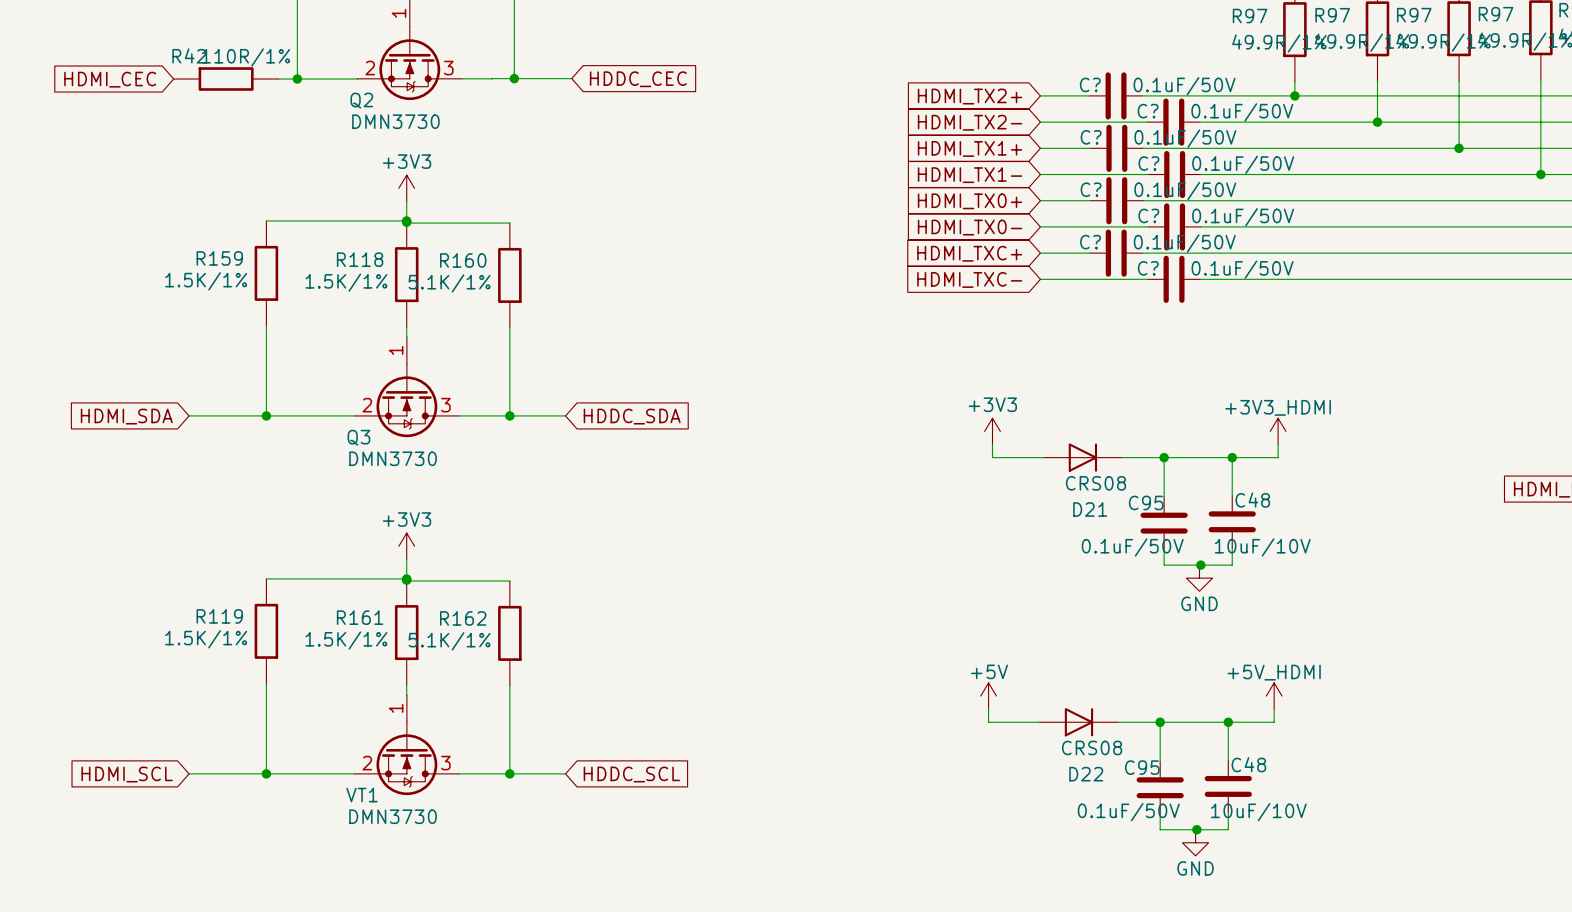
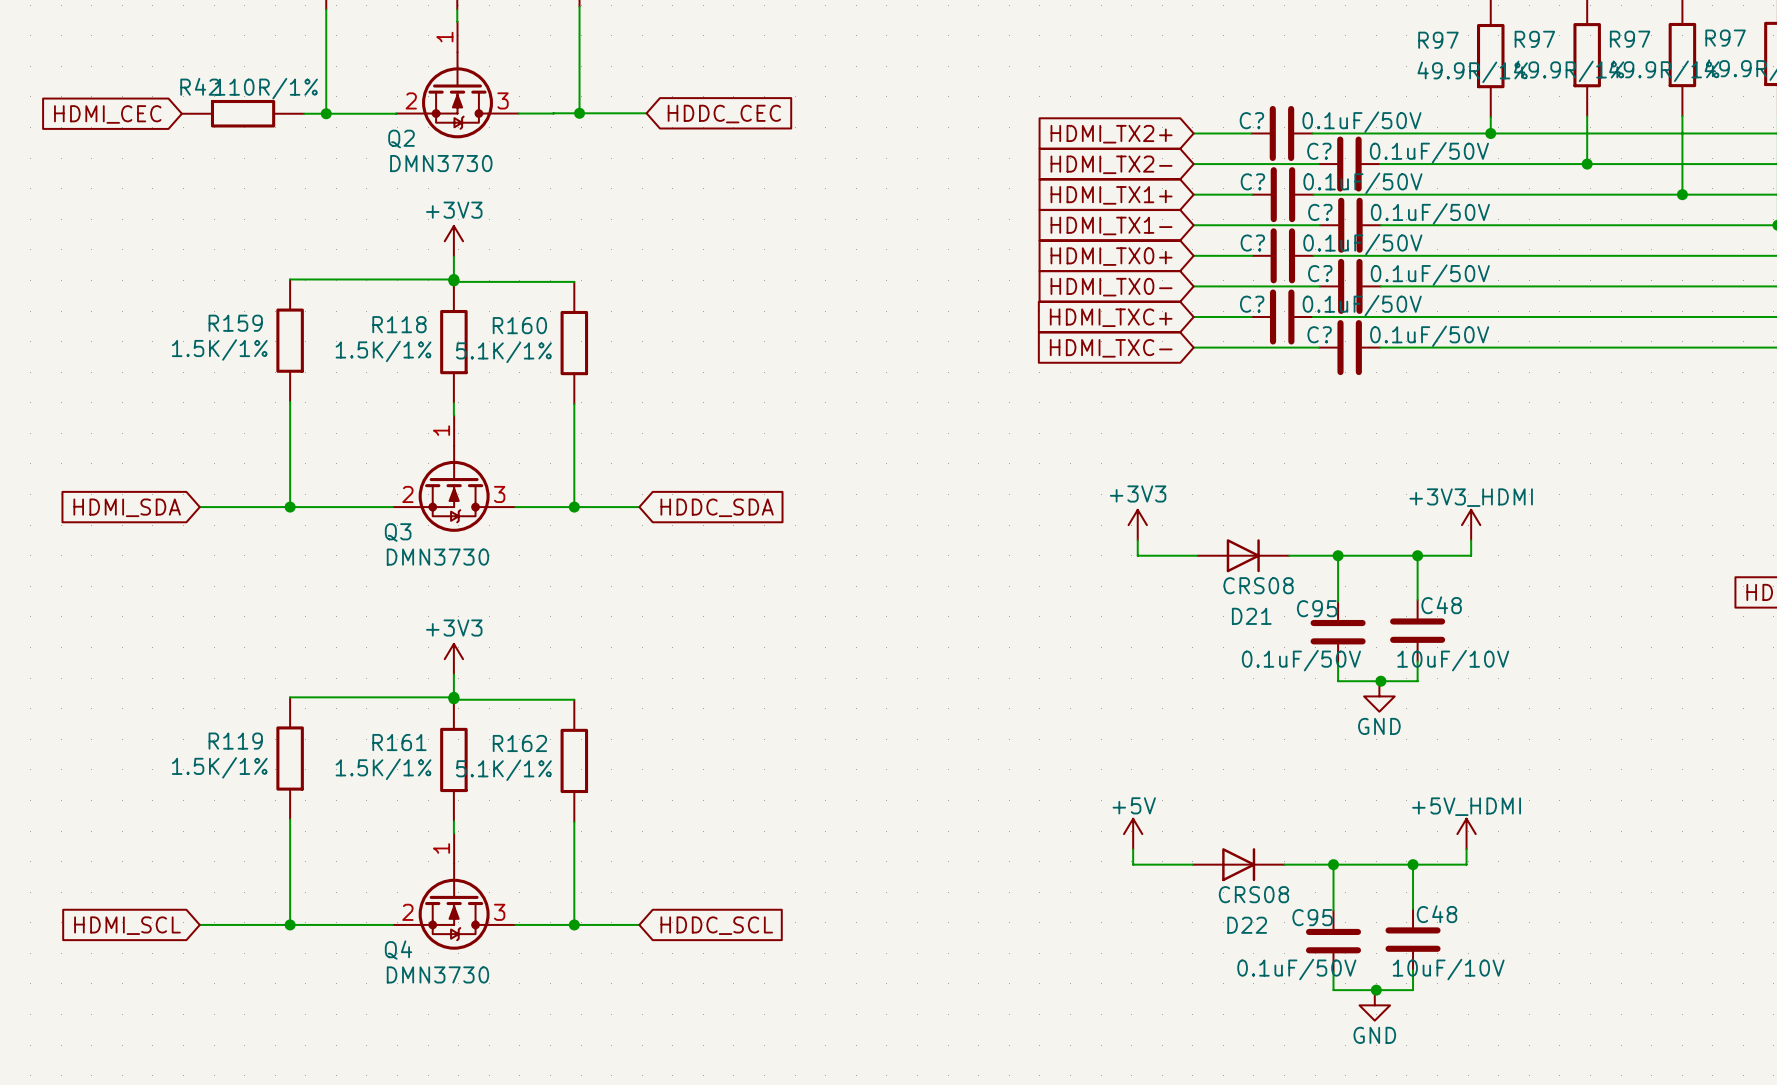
VT1 name: VT1 (362, 795) -> Q4 (398, 950)

